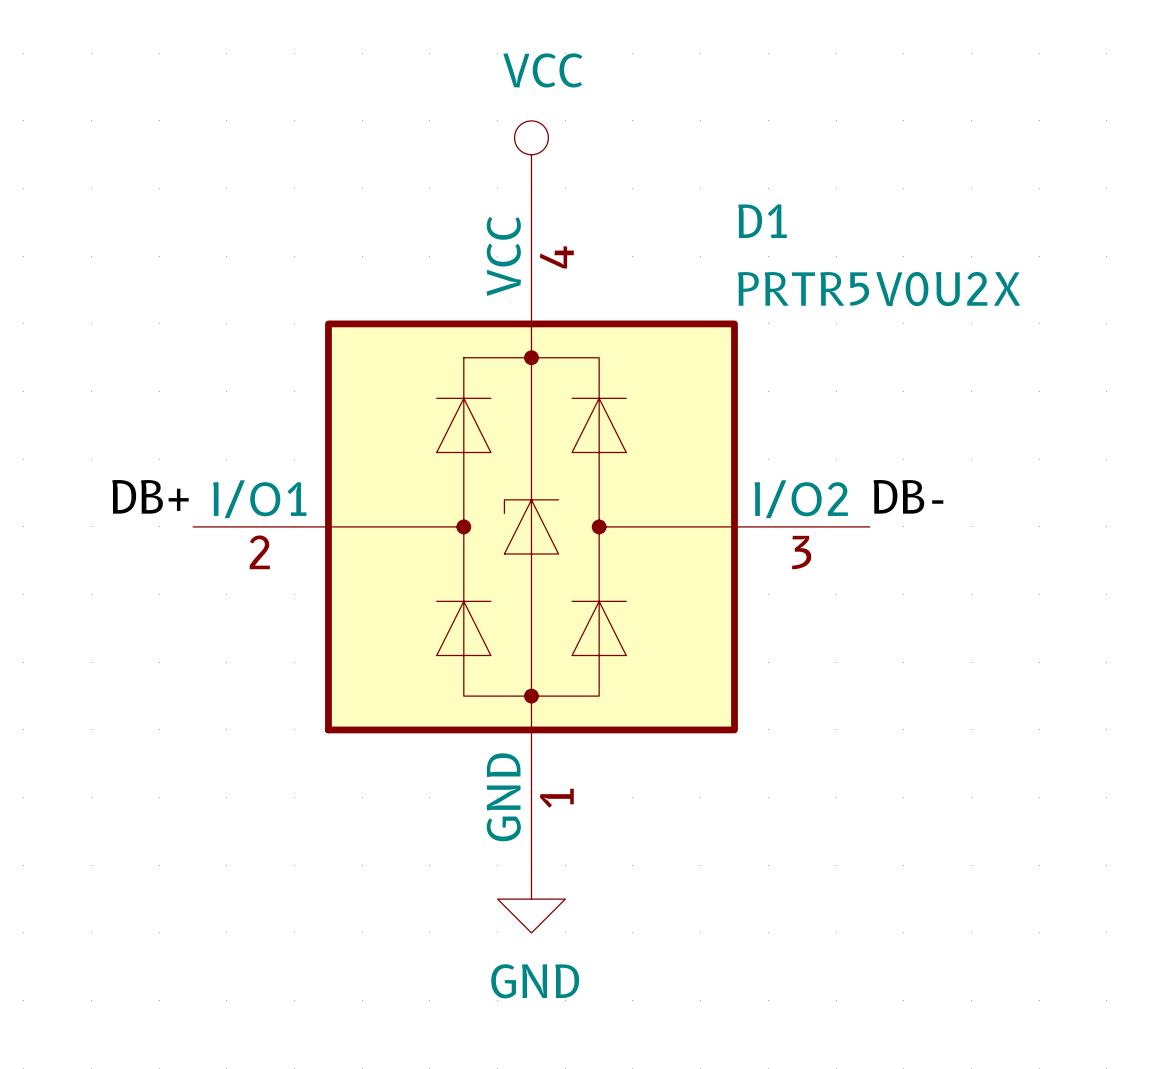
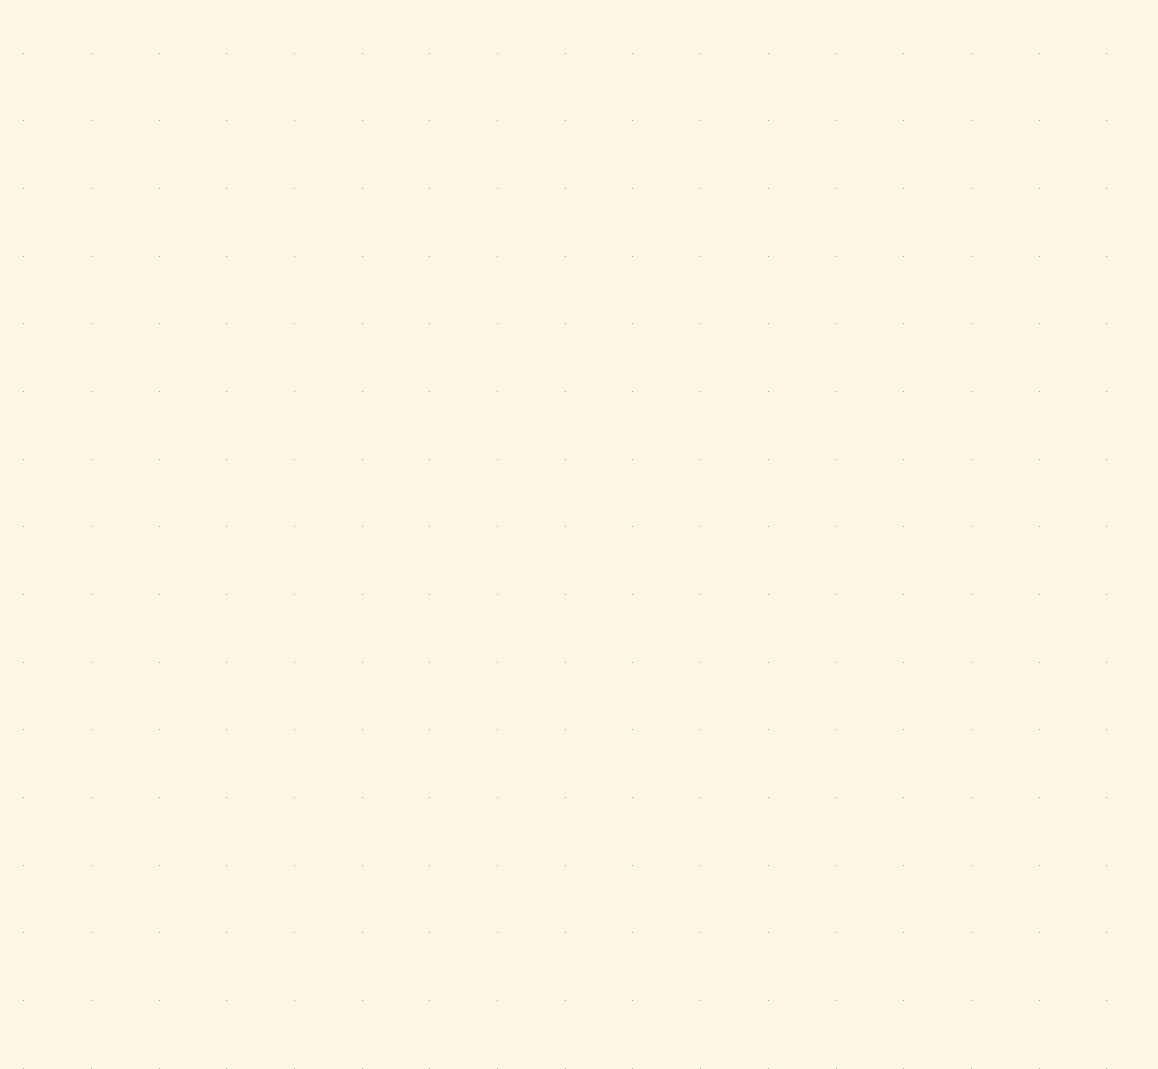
power symbol: VCC (531, 154) -> none
label: DB+ (150, 496) -> none
label: DB- (908, 496) -> none
D1: PRTR5V0U2X (531, 526) -> none
power symbol: GND (531, 899) -> none

